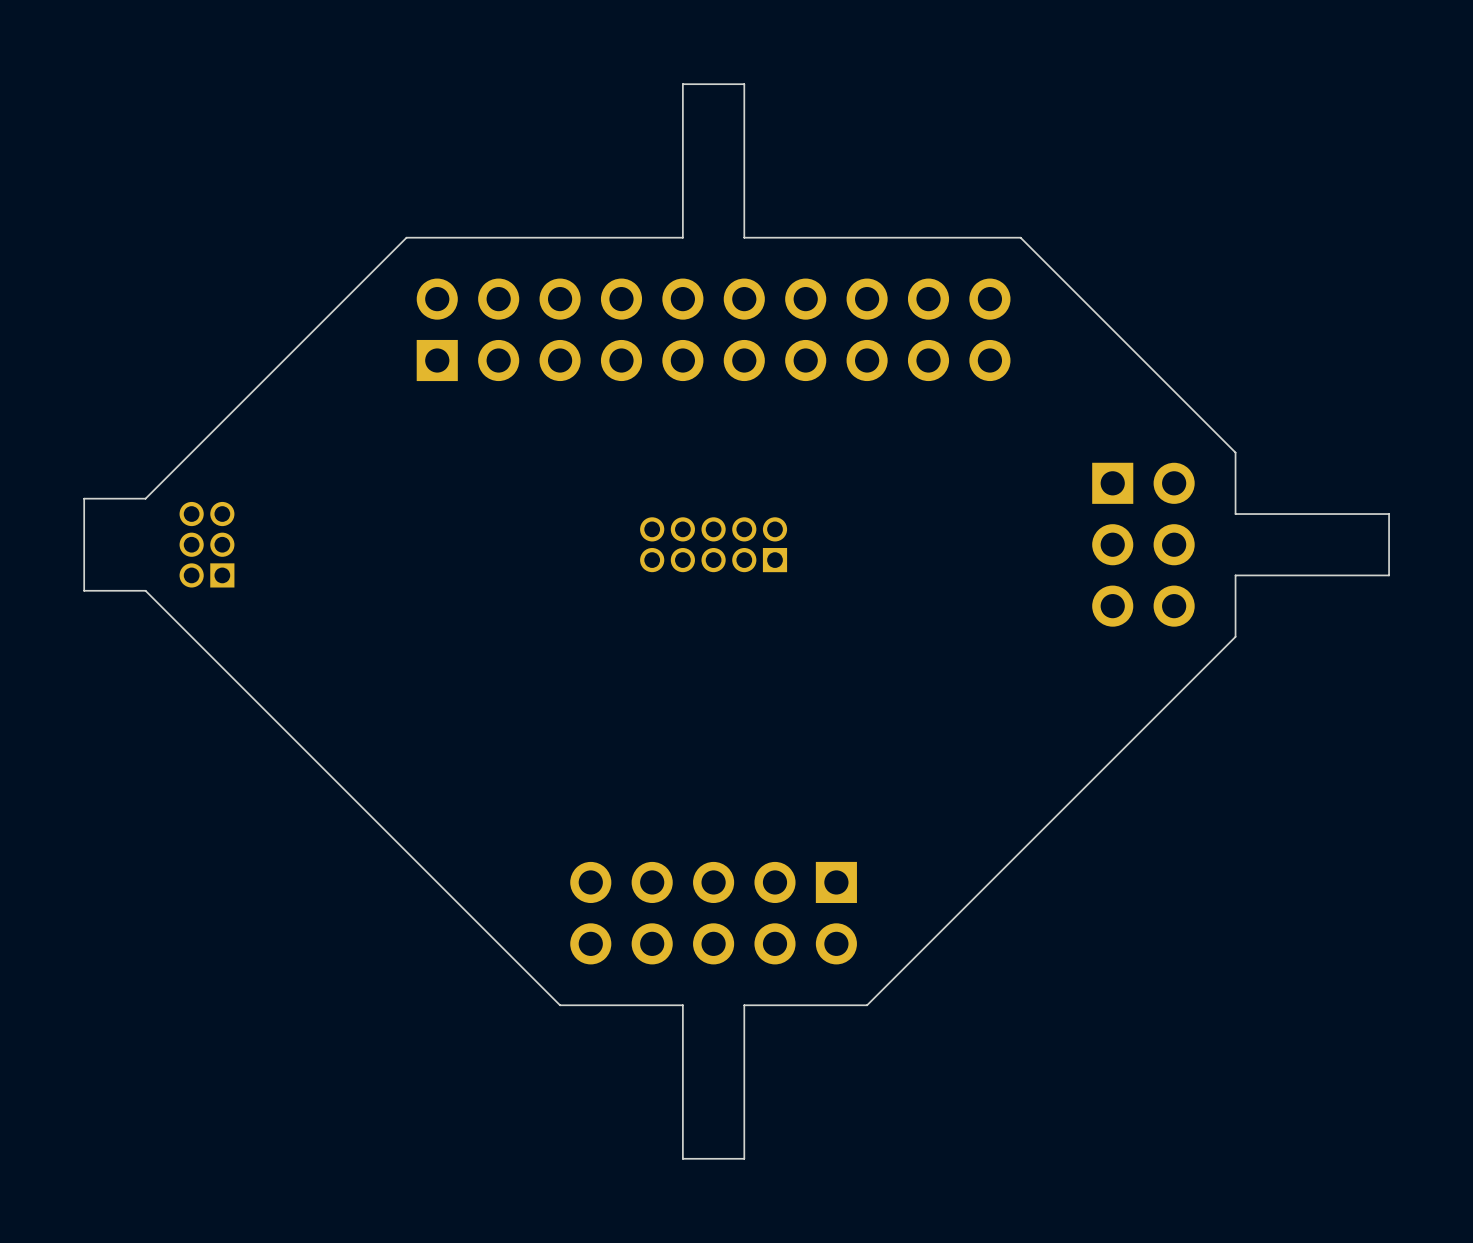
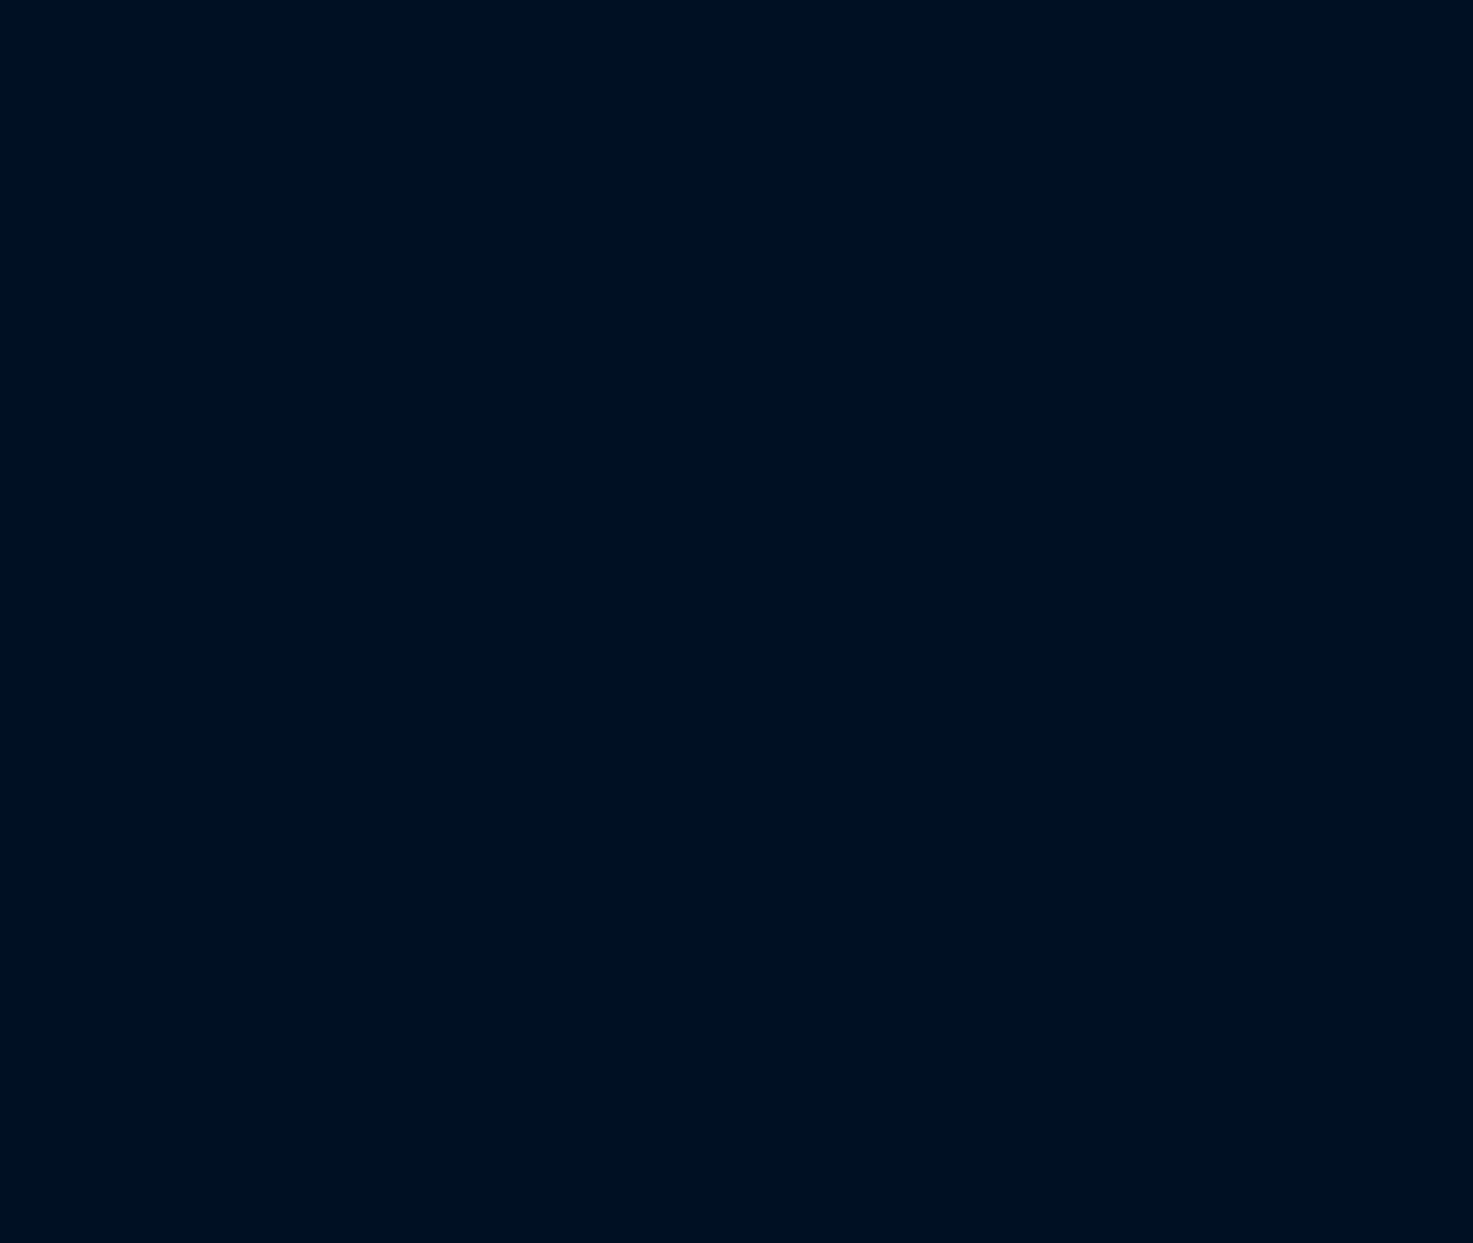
board edge: (744, 84) (744, 237) (1020, 237) (1235, 452) (1235, 514) (1389, 514) (1389, 575) (1235, 575) (1235, 636) (867, 1005) (744, 1005) (744, 1158) (682, 1158) (682, 1005) (560, 1005) (145, 590) (84, 590) (84, 498) (145, 498) (406, 237) (682, 237) (682, 84) (744, 84) -> none
part: (713, 329) -> none
part: (206, 544) -> none
part: (713, 544) -> none
part: (1143, 544) -> none
part: (713, 913) -> none

